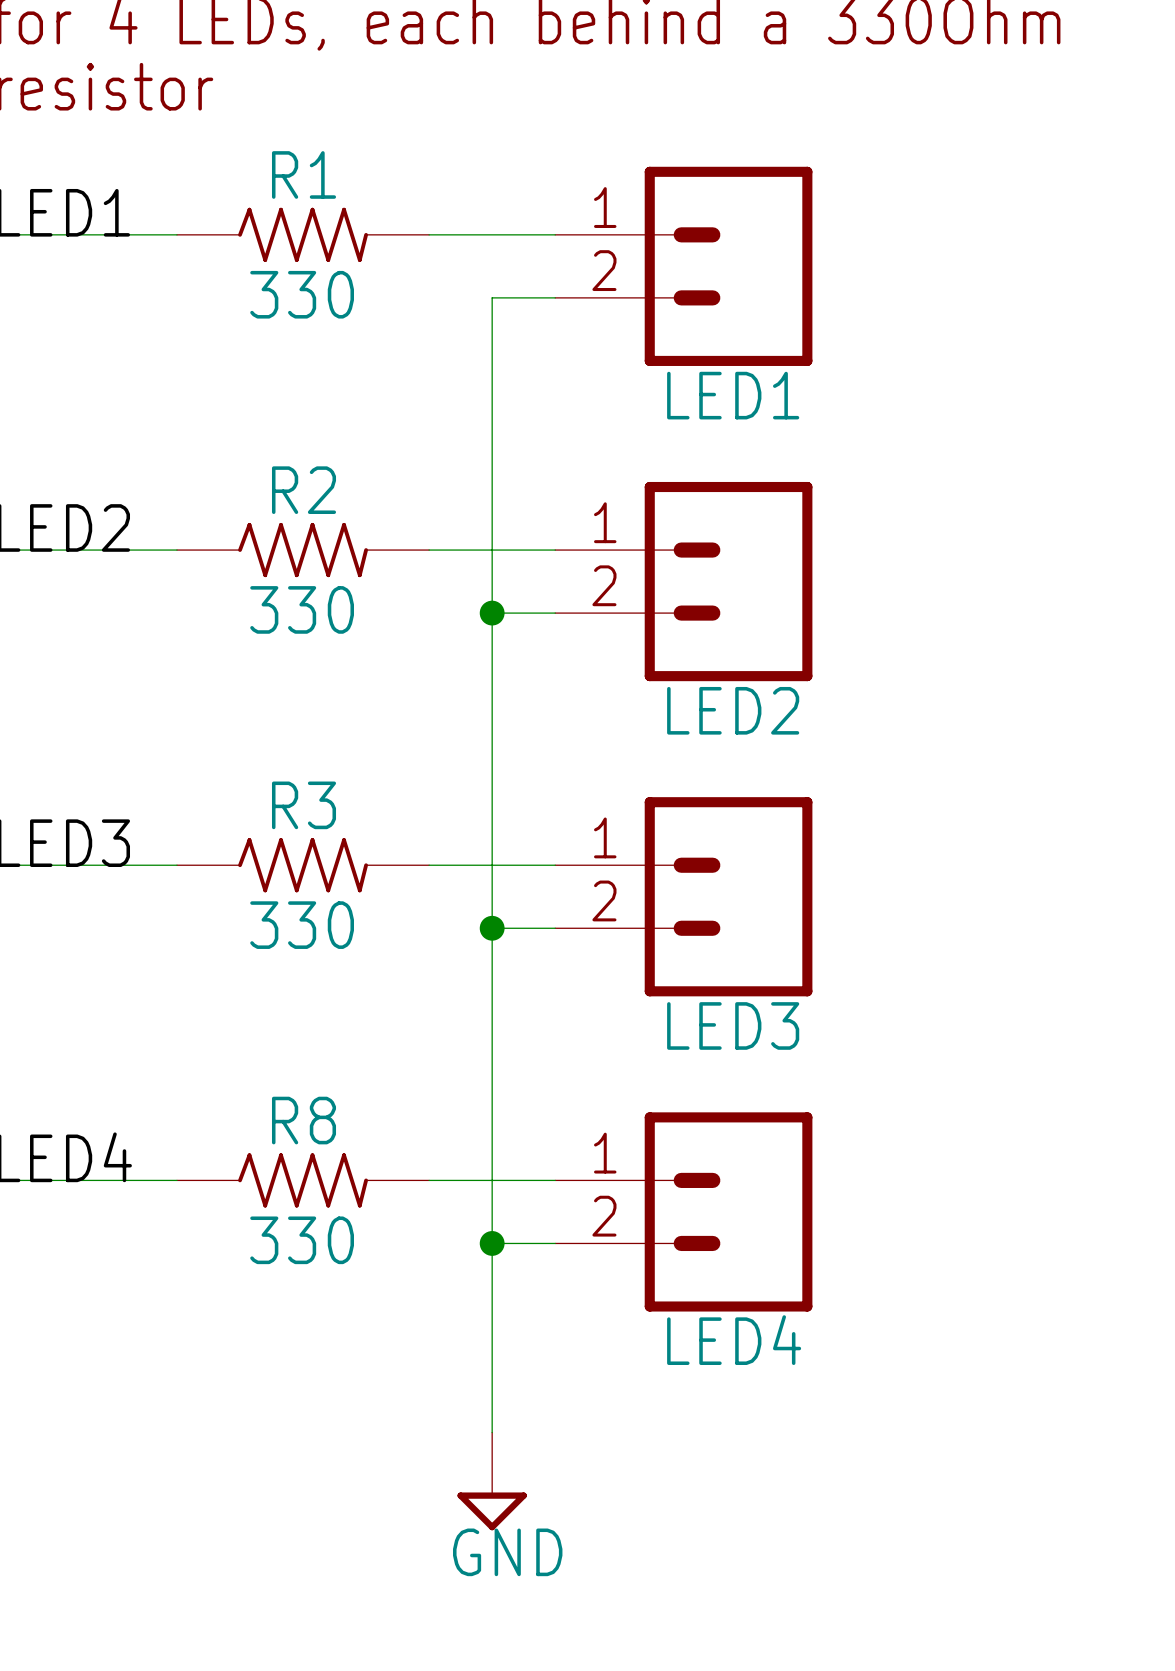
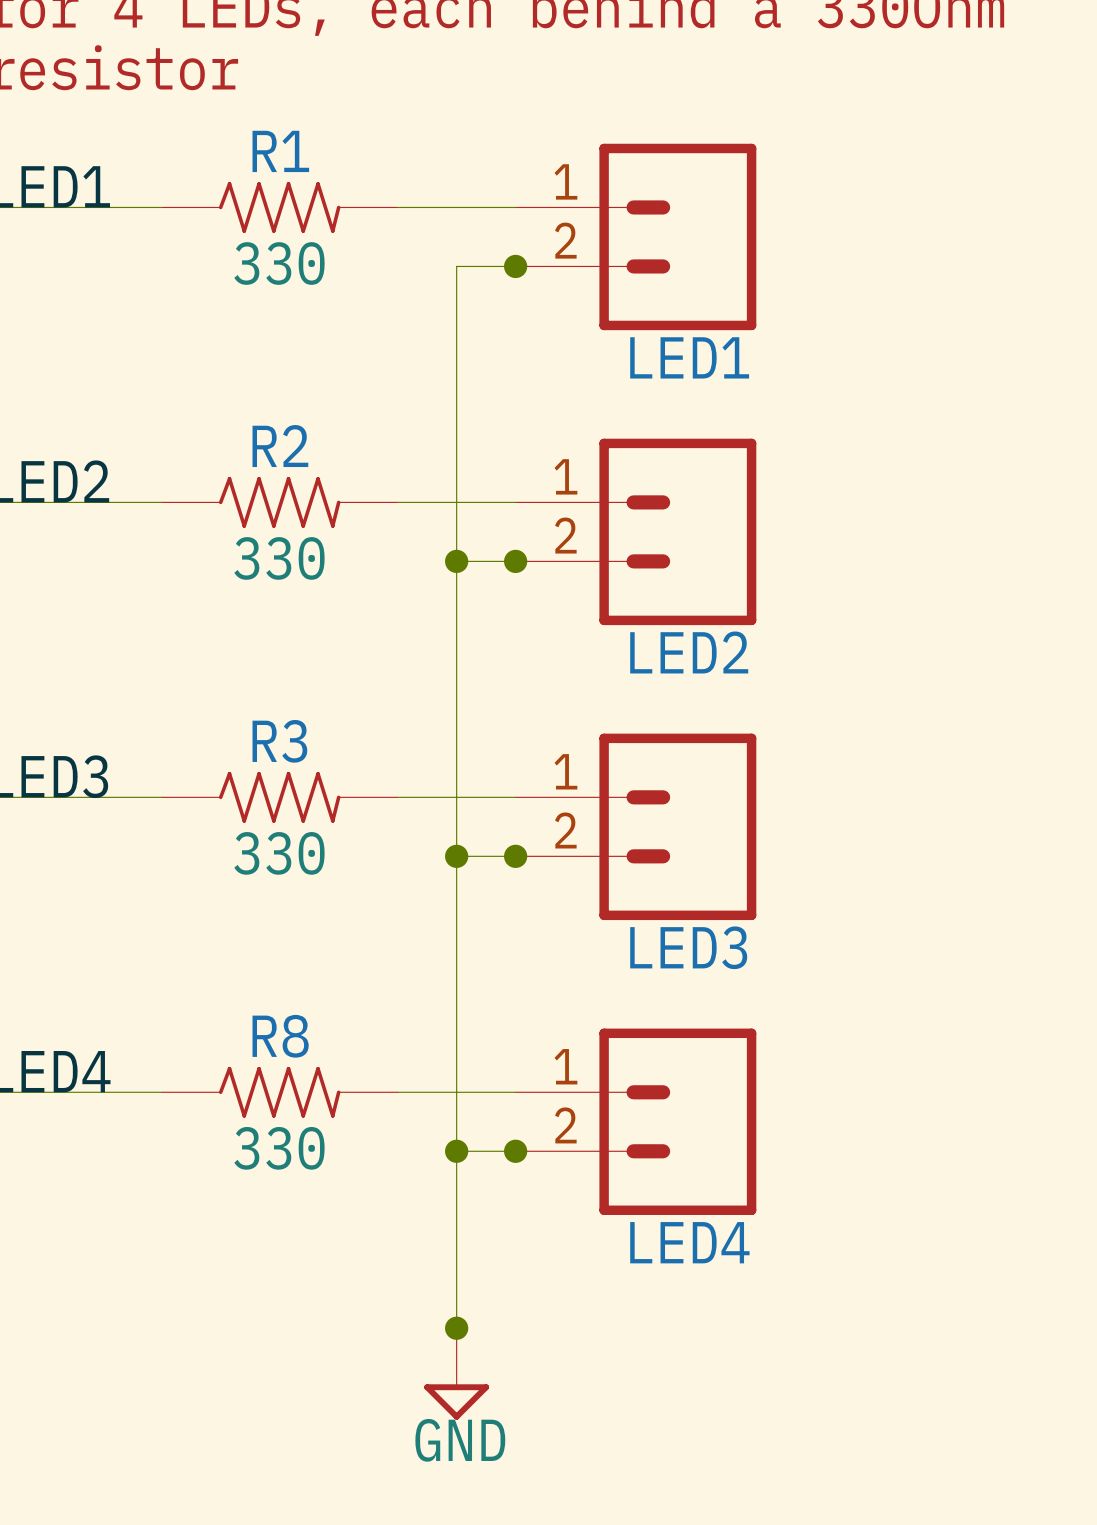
junction: none -> (515, 266)
junction: none -> (515, 561)
junction: none -> (515, 856)
junction: none -> (515, 1151)
junction: none -> (456, 1328)

